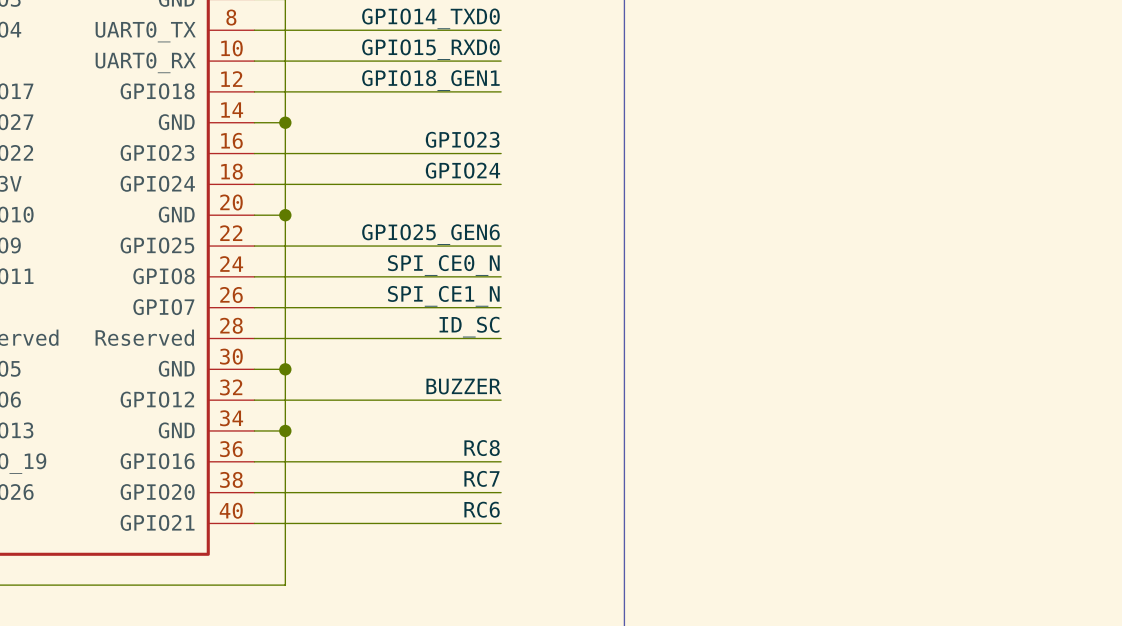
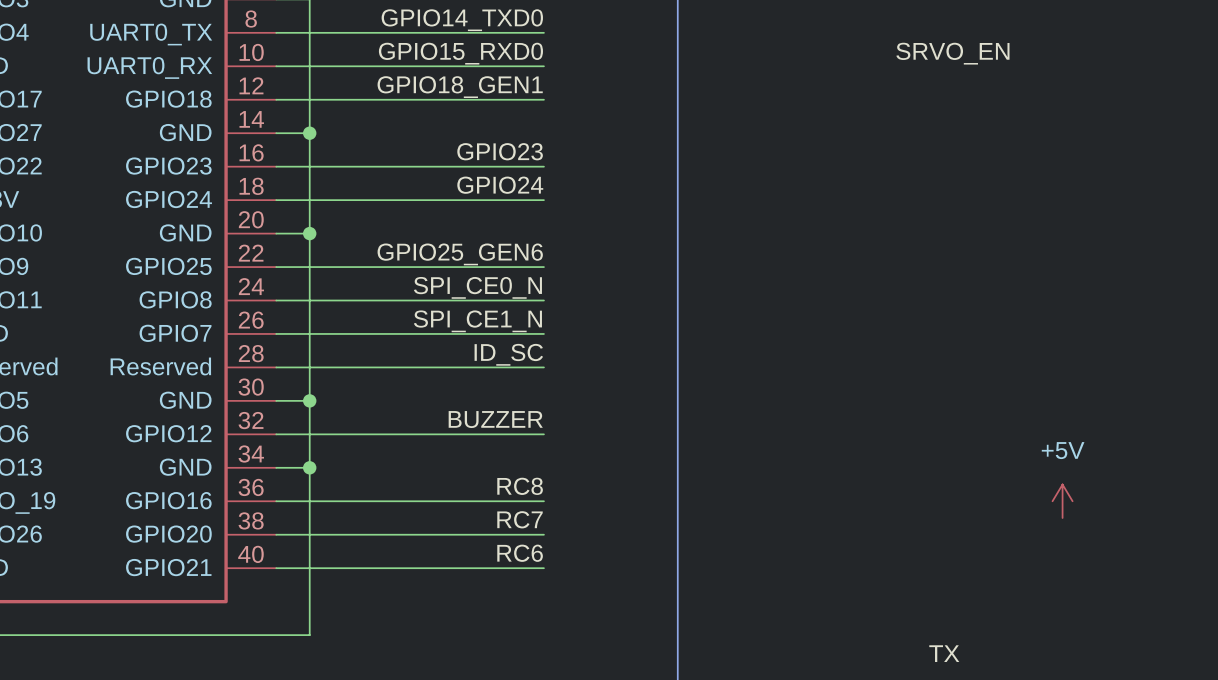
label: none -> SRVO_EN (952, 53)
power symbol: none -> +5V (1062, 501)
label: none -> TX (944, 653)

